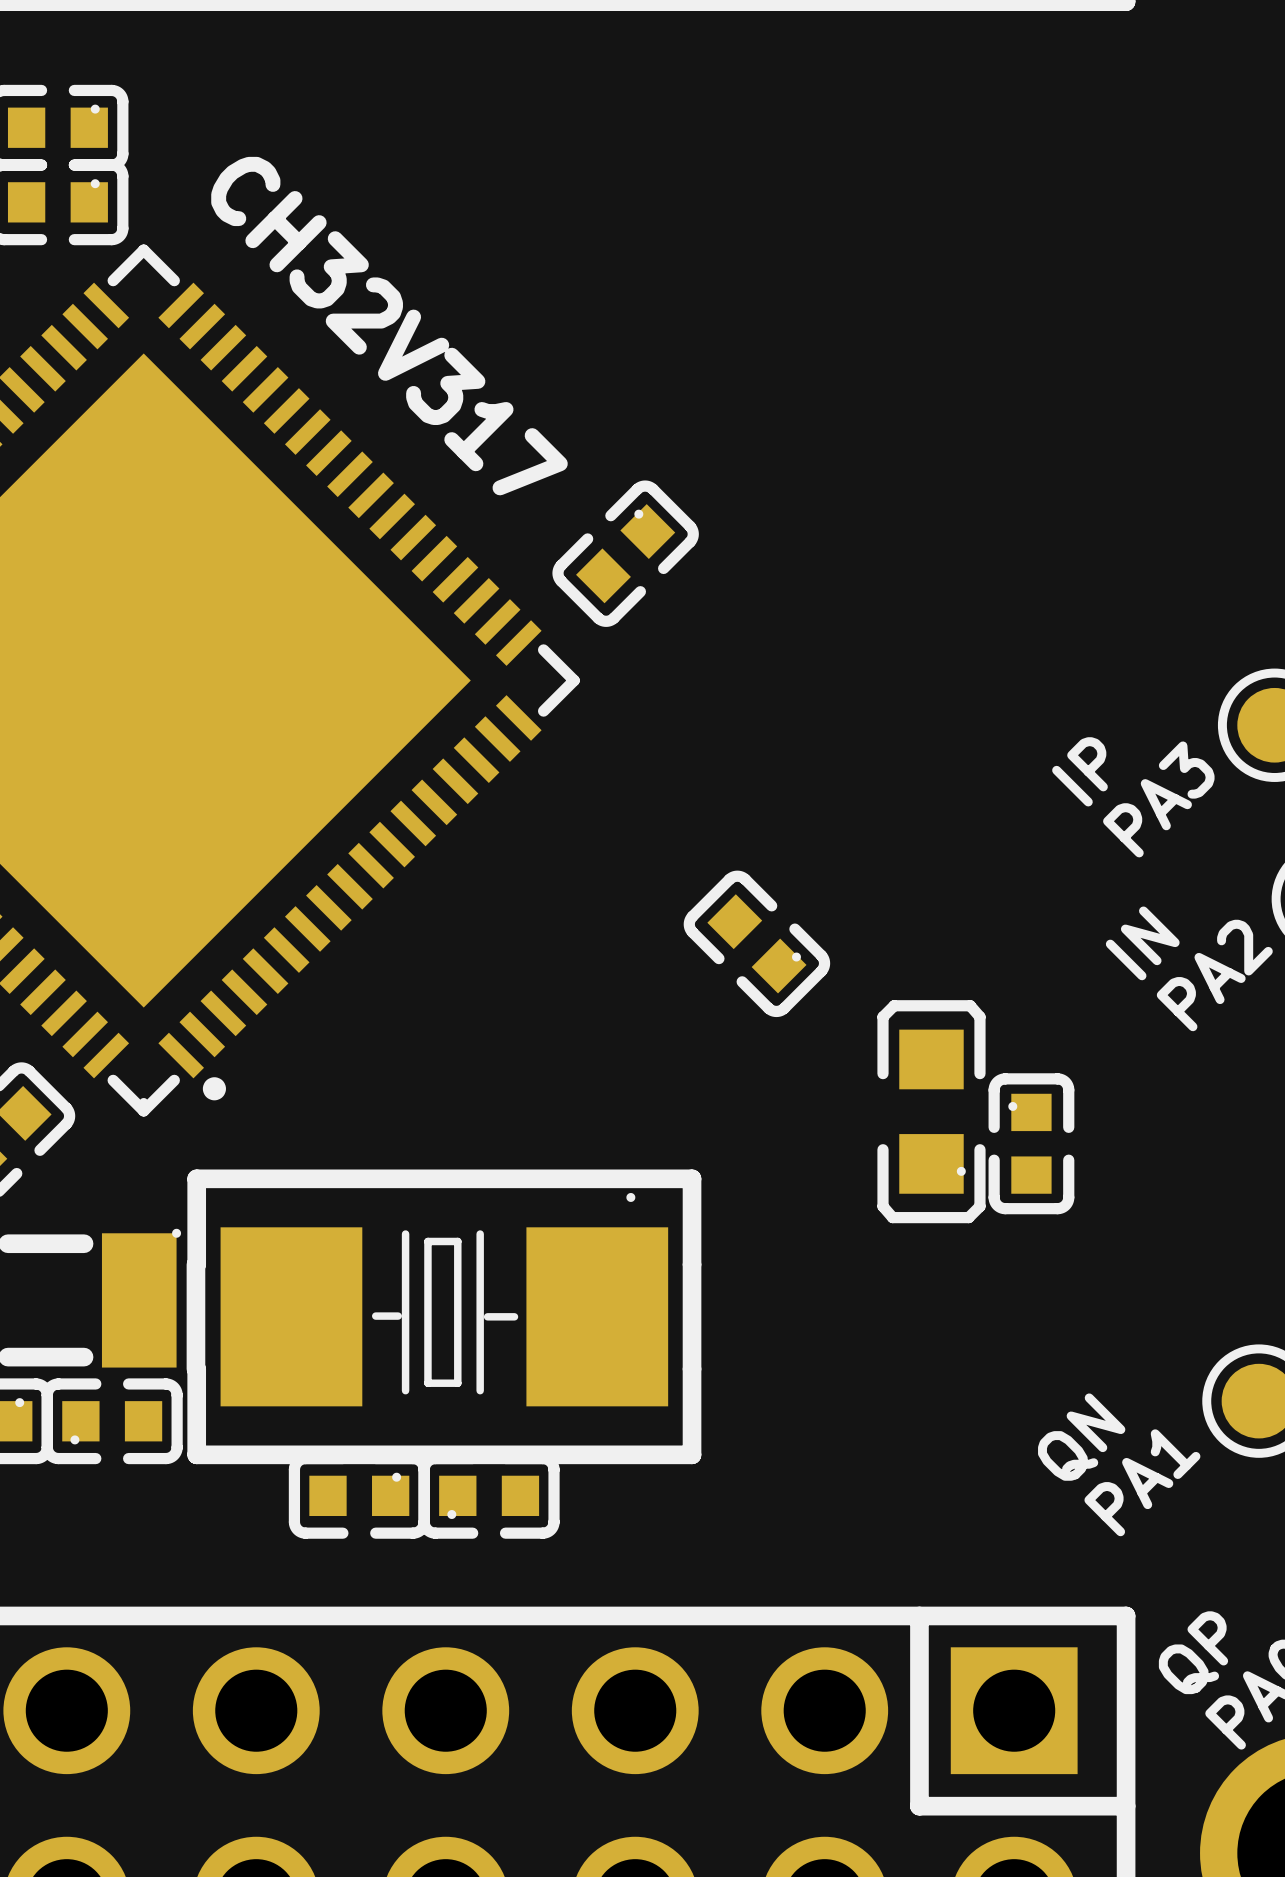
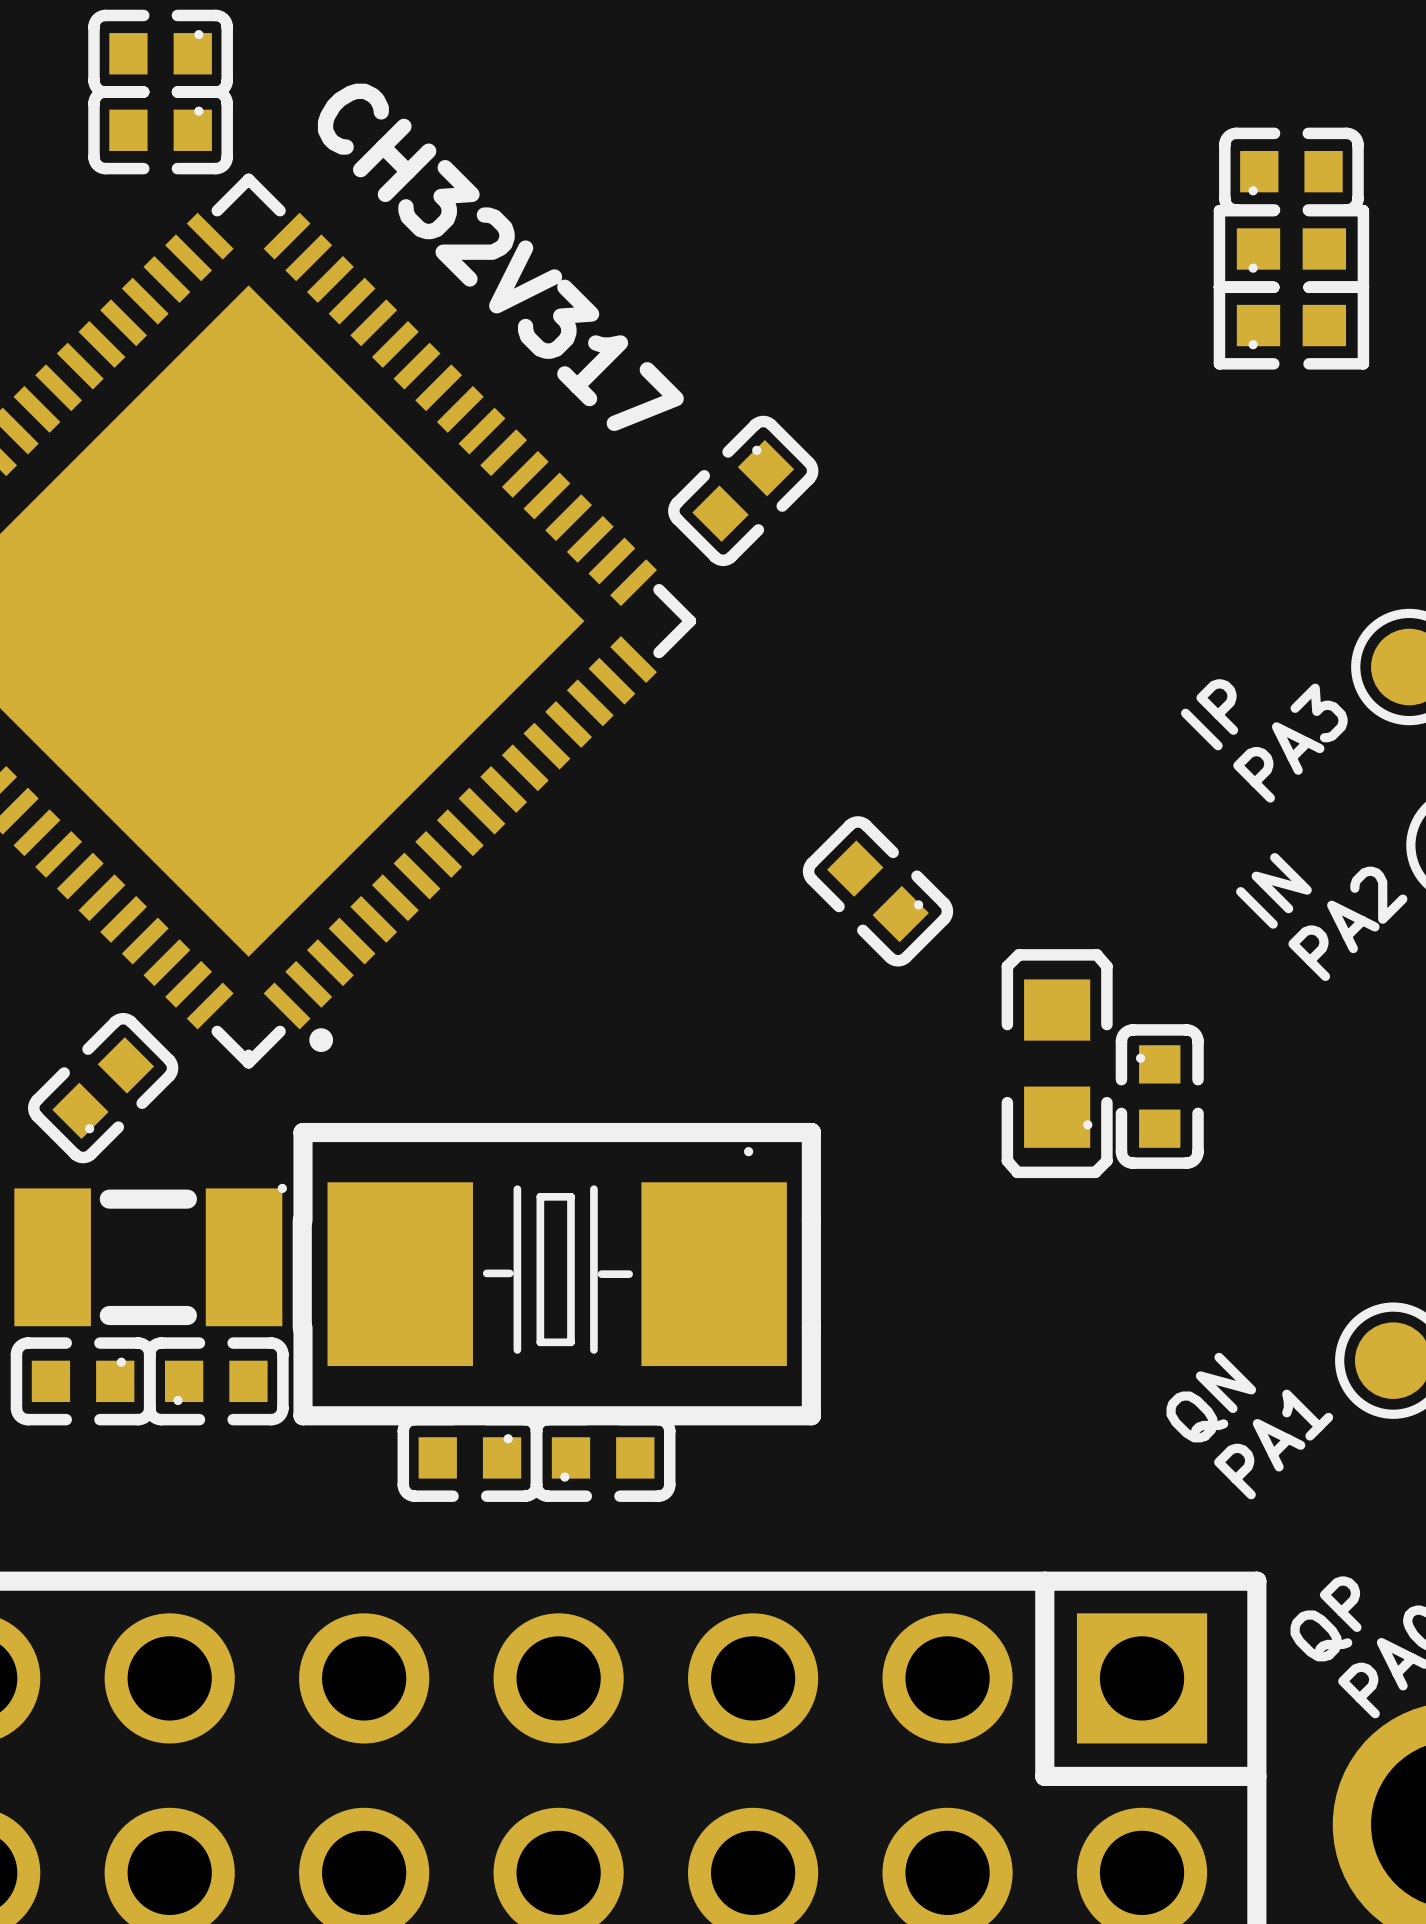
part: none -> (1291, 171)
part: none -> (1291, 248)
part: none -> (1291, 325)

